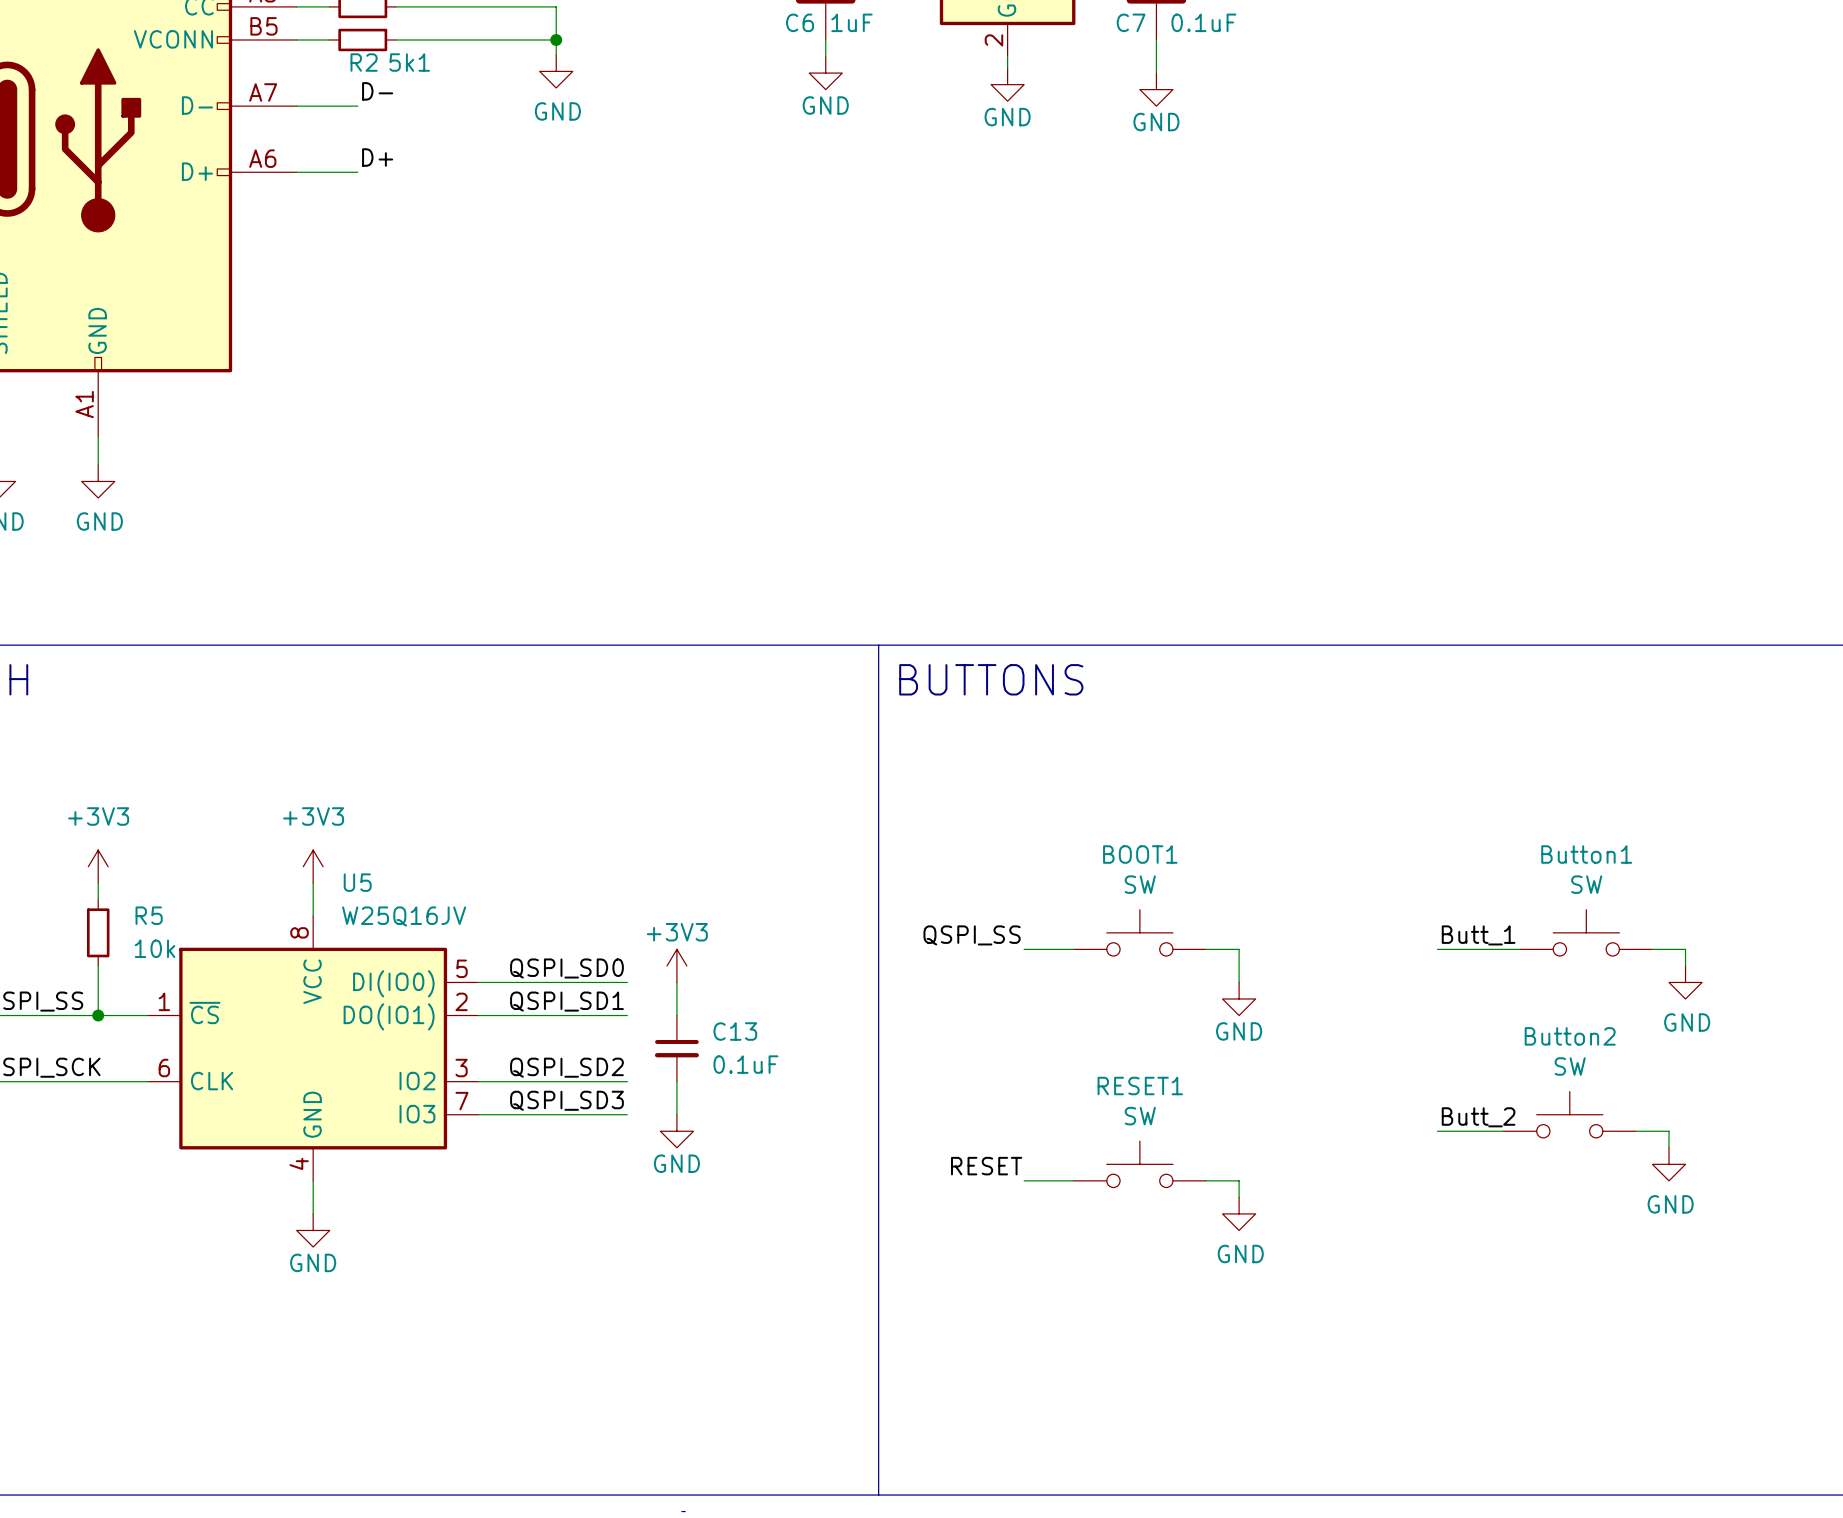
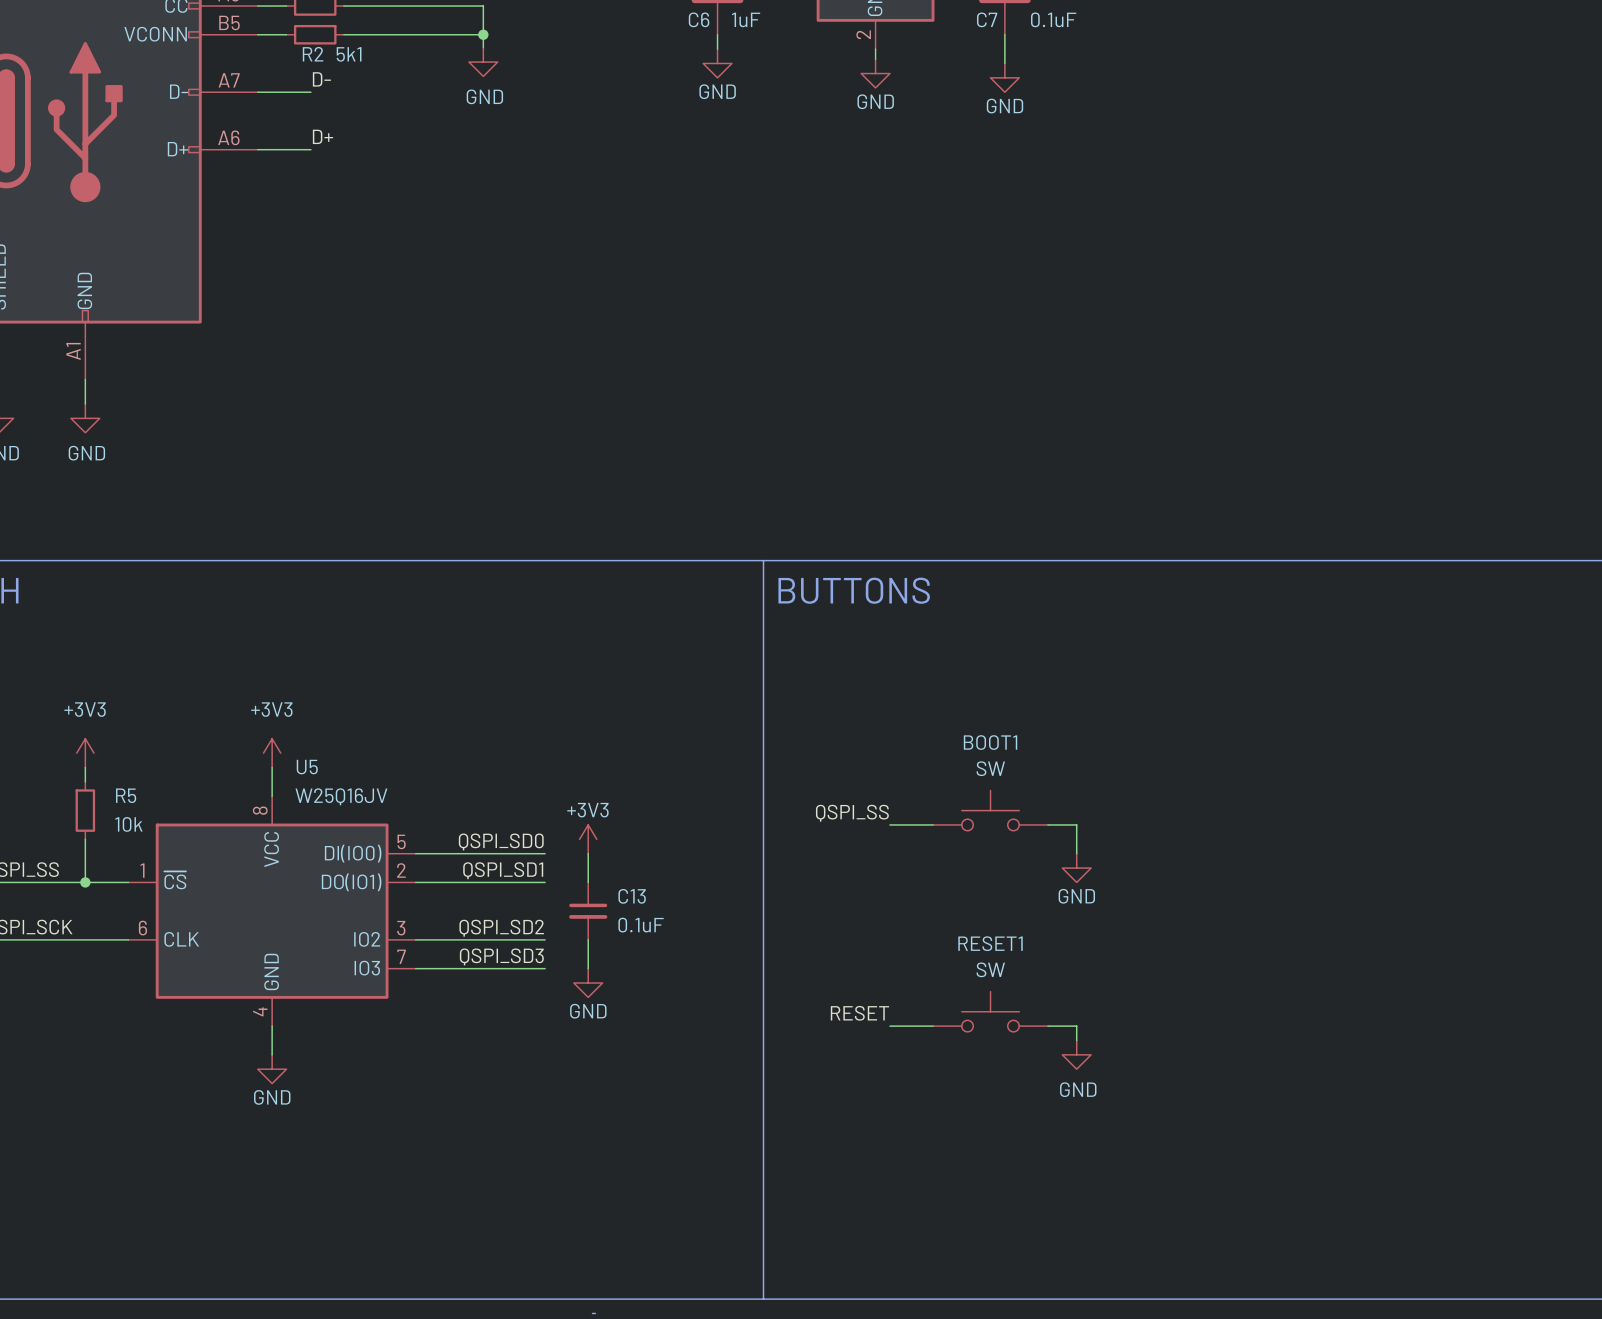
Button1: SW (1586, 932) -> none
label: Butt_1 (1478, 935) -> none
wire: (1437, 949) (1520, 949) -> none
wire: (1652, 949) (1685, 949) (1685, 965) -> none
power symbol: GND (1685, 982) -> none
Button2: SW (1569, 1114) -> none
label: Butt_2 (1478, 1117) -> none
wire: (1437, 1131) (1503, 1131) -> none
wire: (1635, 1131) (1668, 1131) (1668, 1147) -> none
power symbol: GND (1668, 1164) -> none

